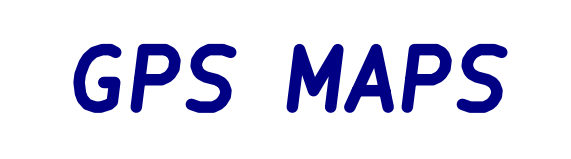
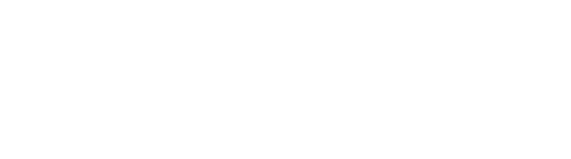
text: GPS MAPS (290, 78) -> none

